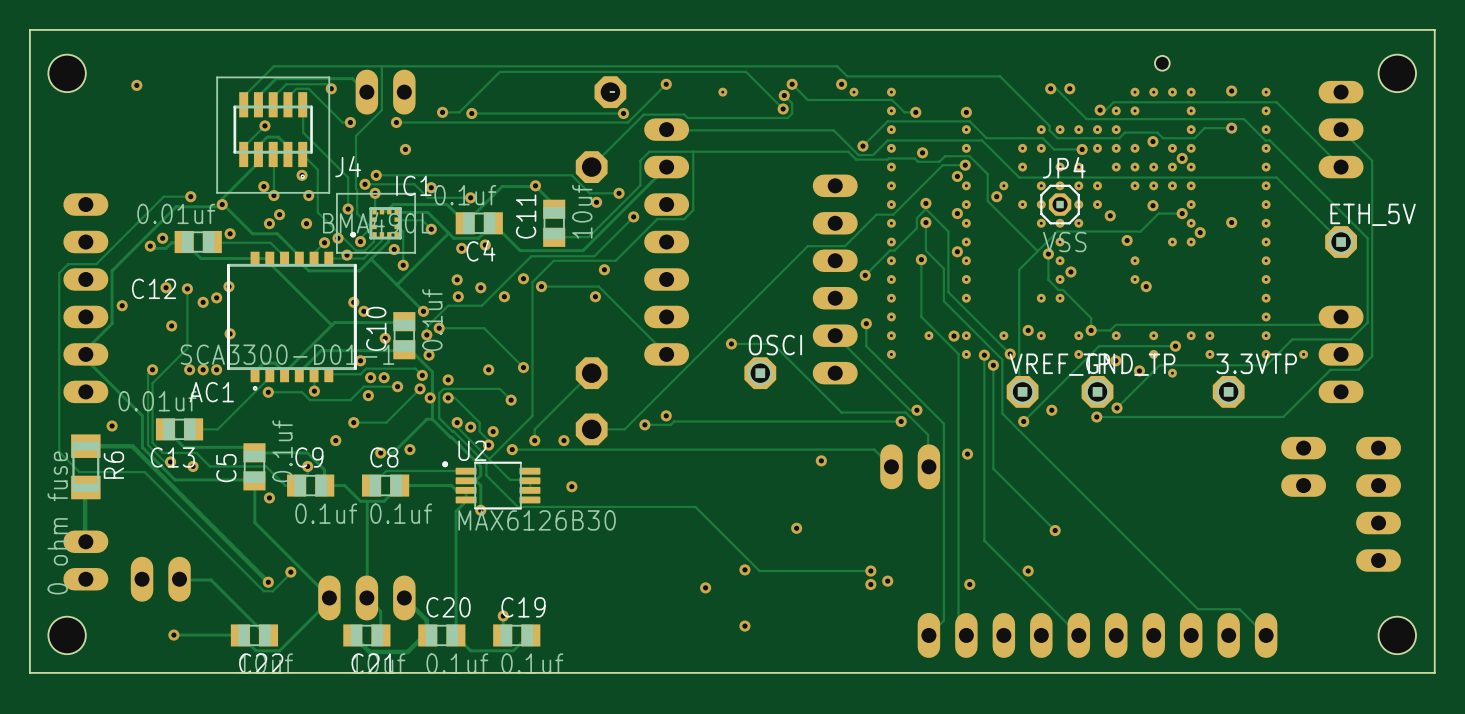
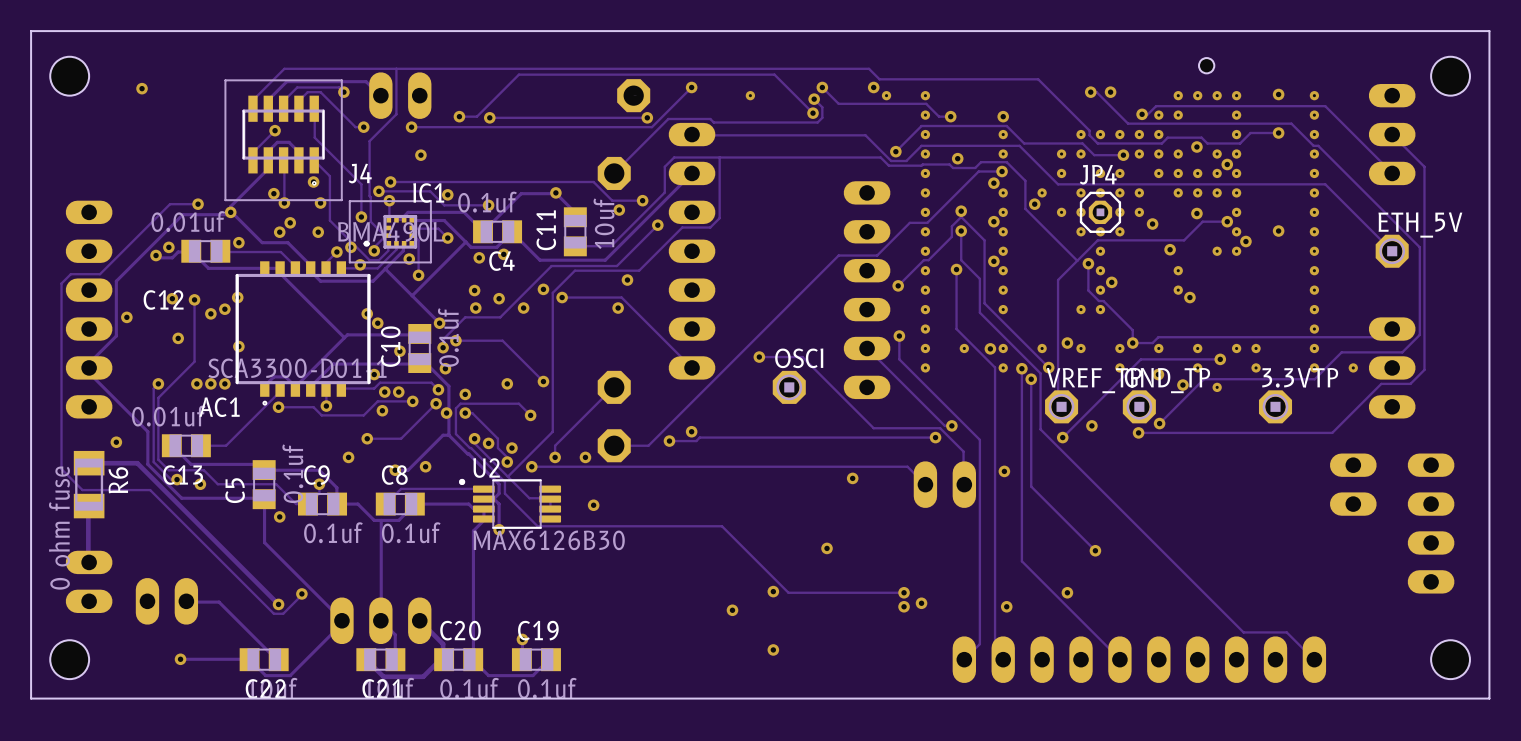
JP4 value: VSS (1064, 242) -> none

